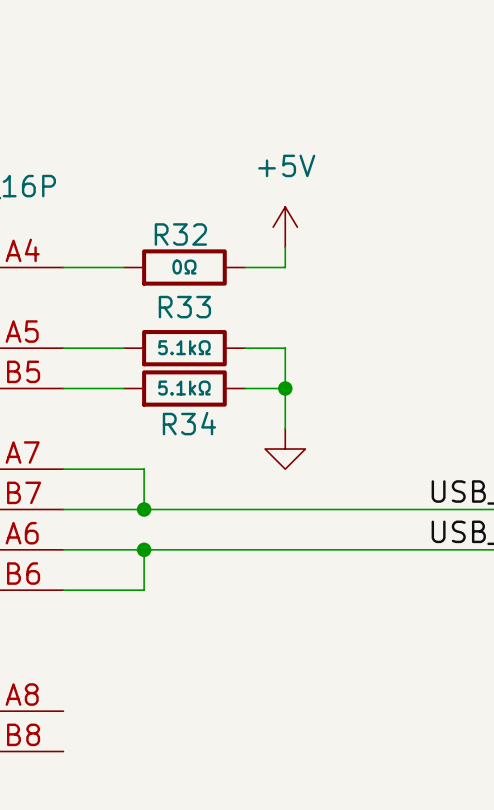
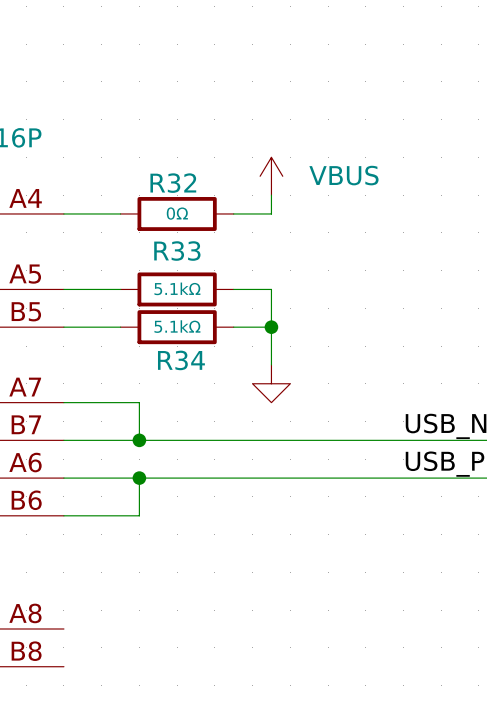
power symbol: +5V (285, 227) -> VBUS (271, 176)

